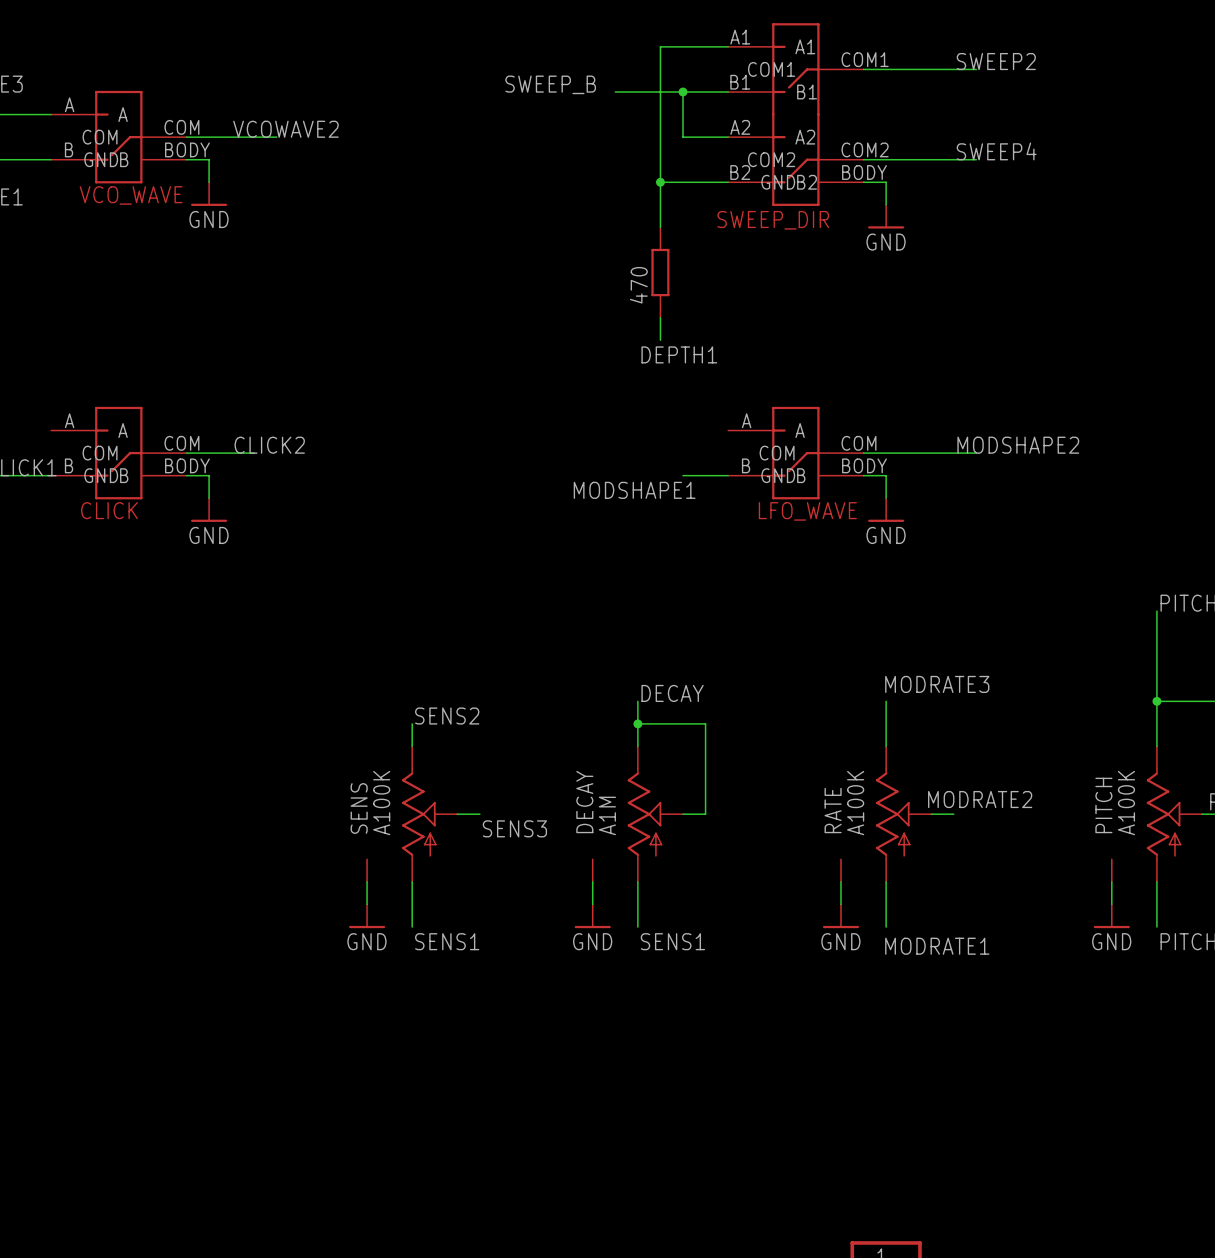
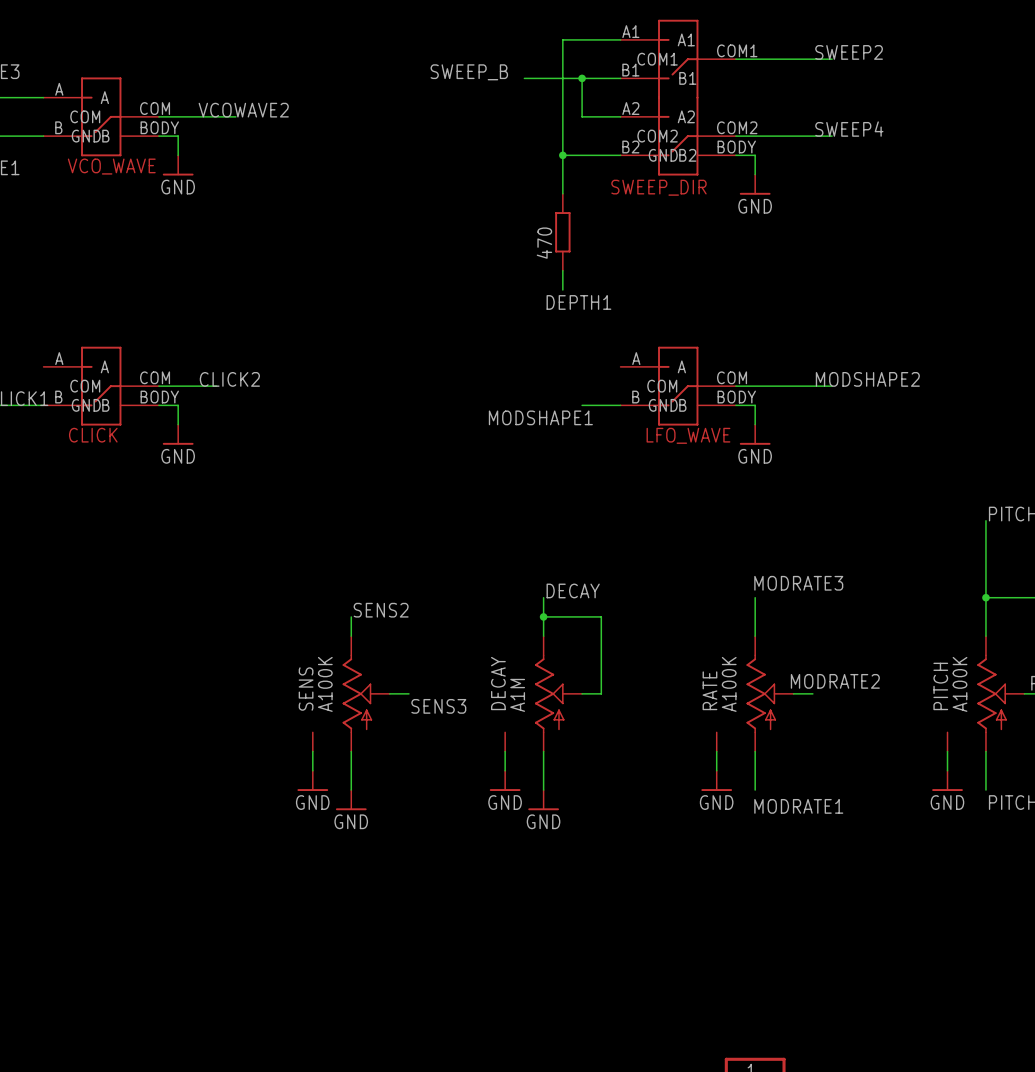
power symbol: none -> GND (351, 800)
power symbol: none -> GND (543, 800)
label: SENS1 (447, 941) -> none
label: SENS1 (672, 941) -> none

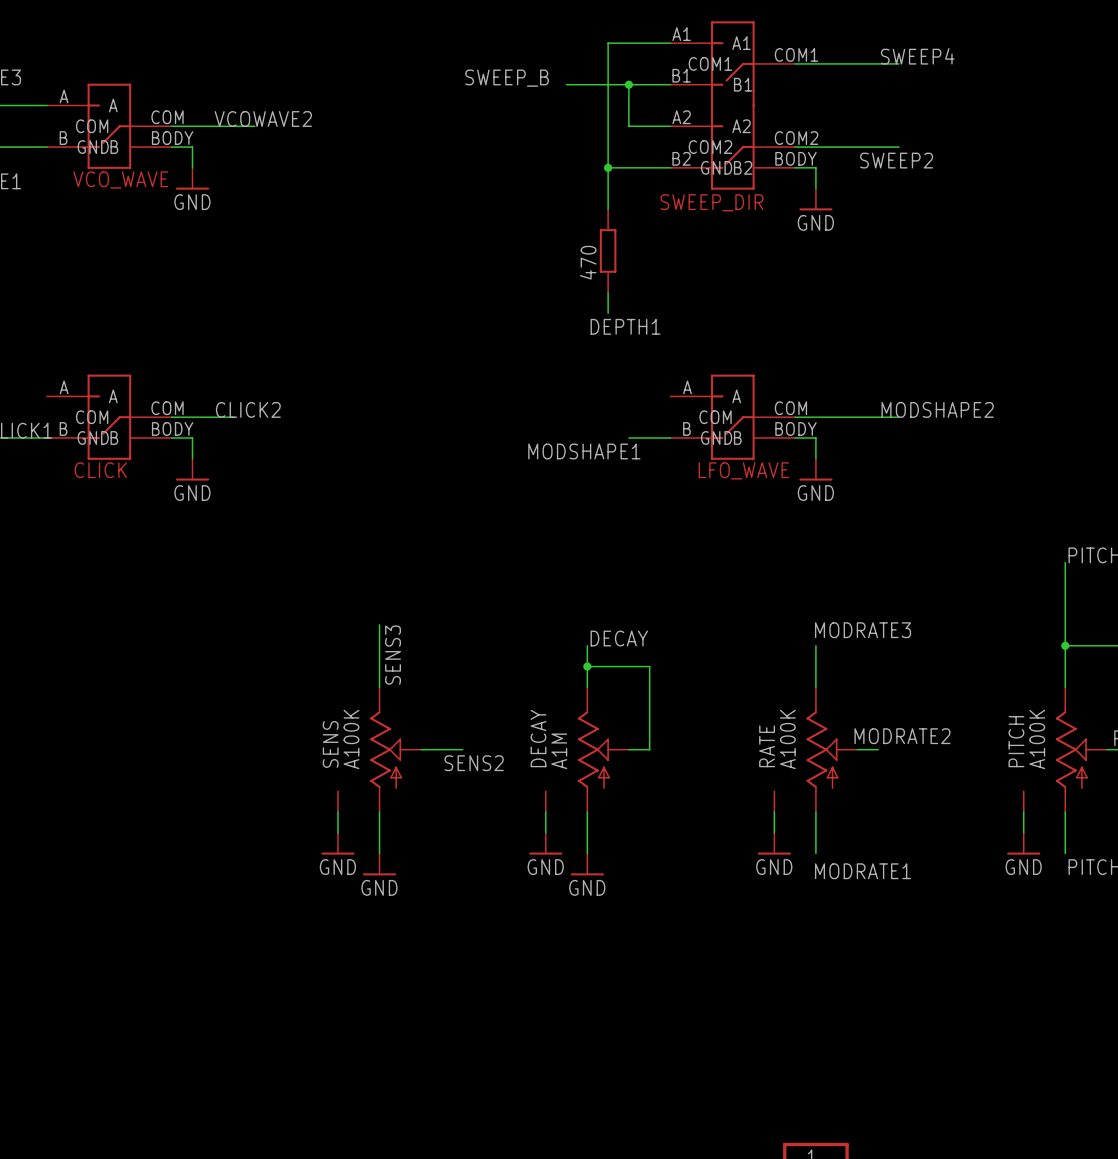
label: SWEEP2 (849, 52) -> SWEEP4 (917, 56)
label: SWEEP4 (849, 129) -> SWEEP2 (896, 160)
wire: none -> (379, 625) (379, 666)
label: SENS2 (381, 610) -> SENS3 (393, 655)
wire: none -> (441, 749) (462, 749)
label: SENS3 (438, 706) -> SENS2 (474, 763)

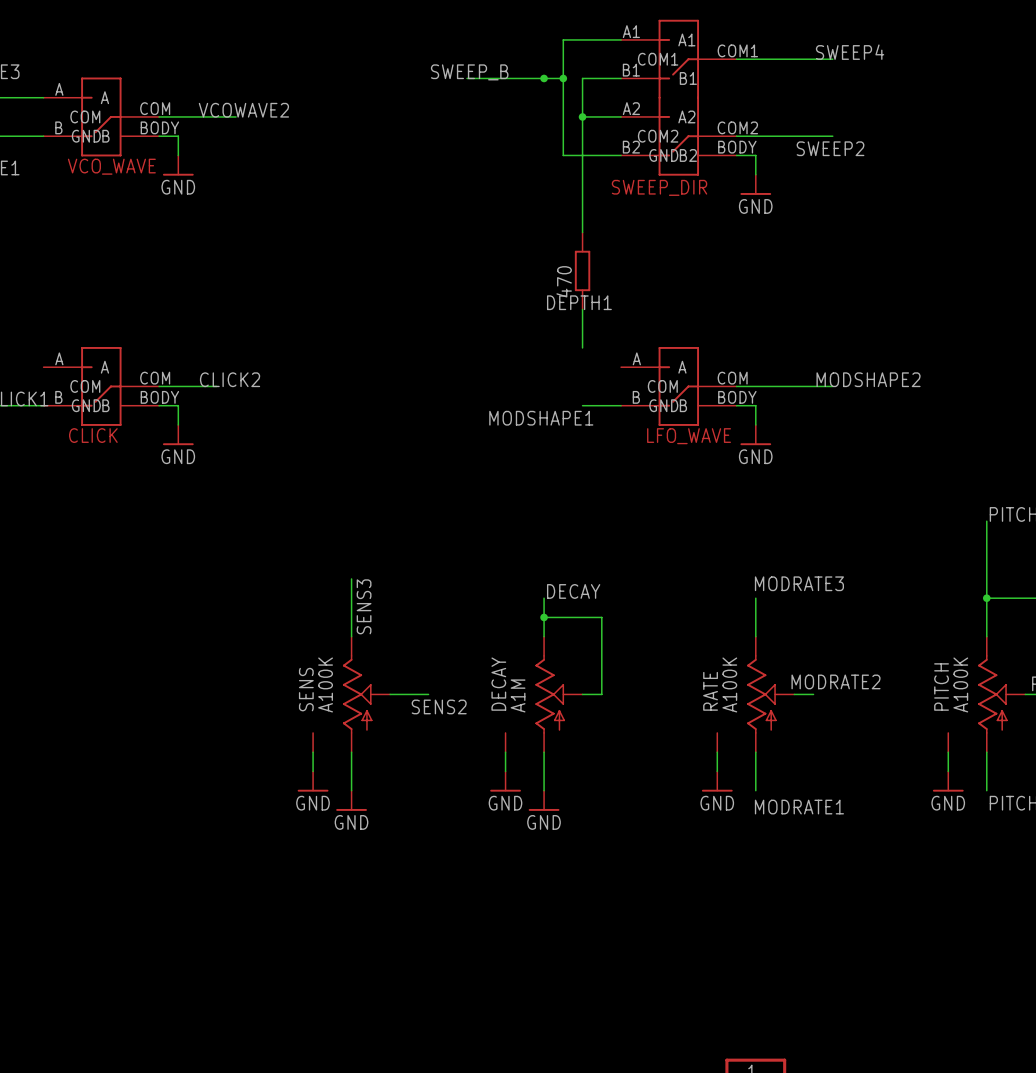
wire: none -> (467, 78) (524, 78)
junction: none -> (544, 78)
wire: (608, 84) (628, 84) -> none
junction: none -> (563, 78)
junction: (628, 84) -> none
wire: none -> (582, 116) (582, 232)
junction: none -> (582, 116)
wire: (608, 167) (608, 209) -> (582, 309) (582, 347)
junction: (608, 167) -> none
470 position: (608, 250) -> (582, 270)
wire: (608, 292) (608, 313) -> none

